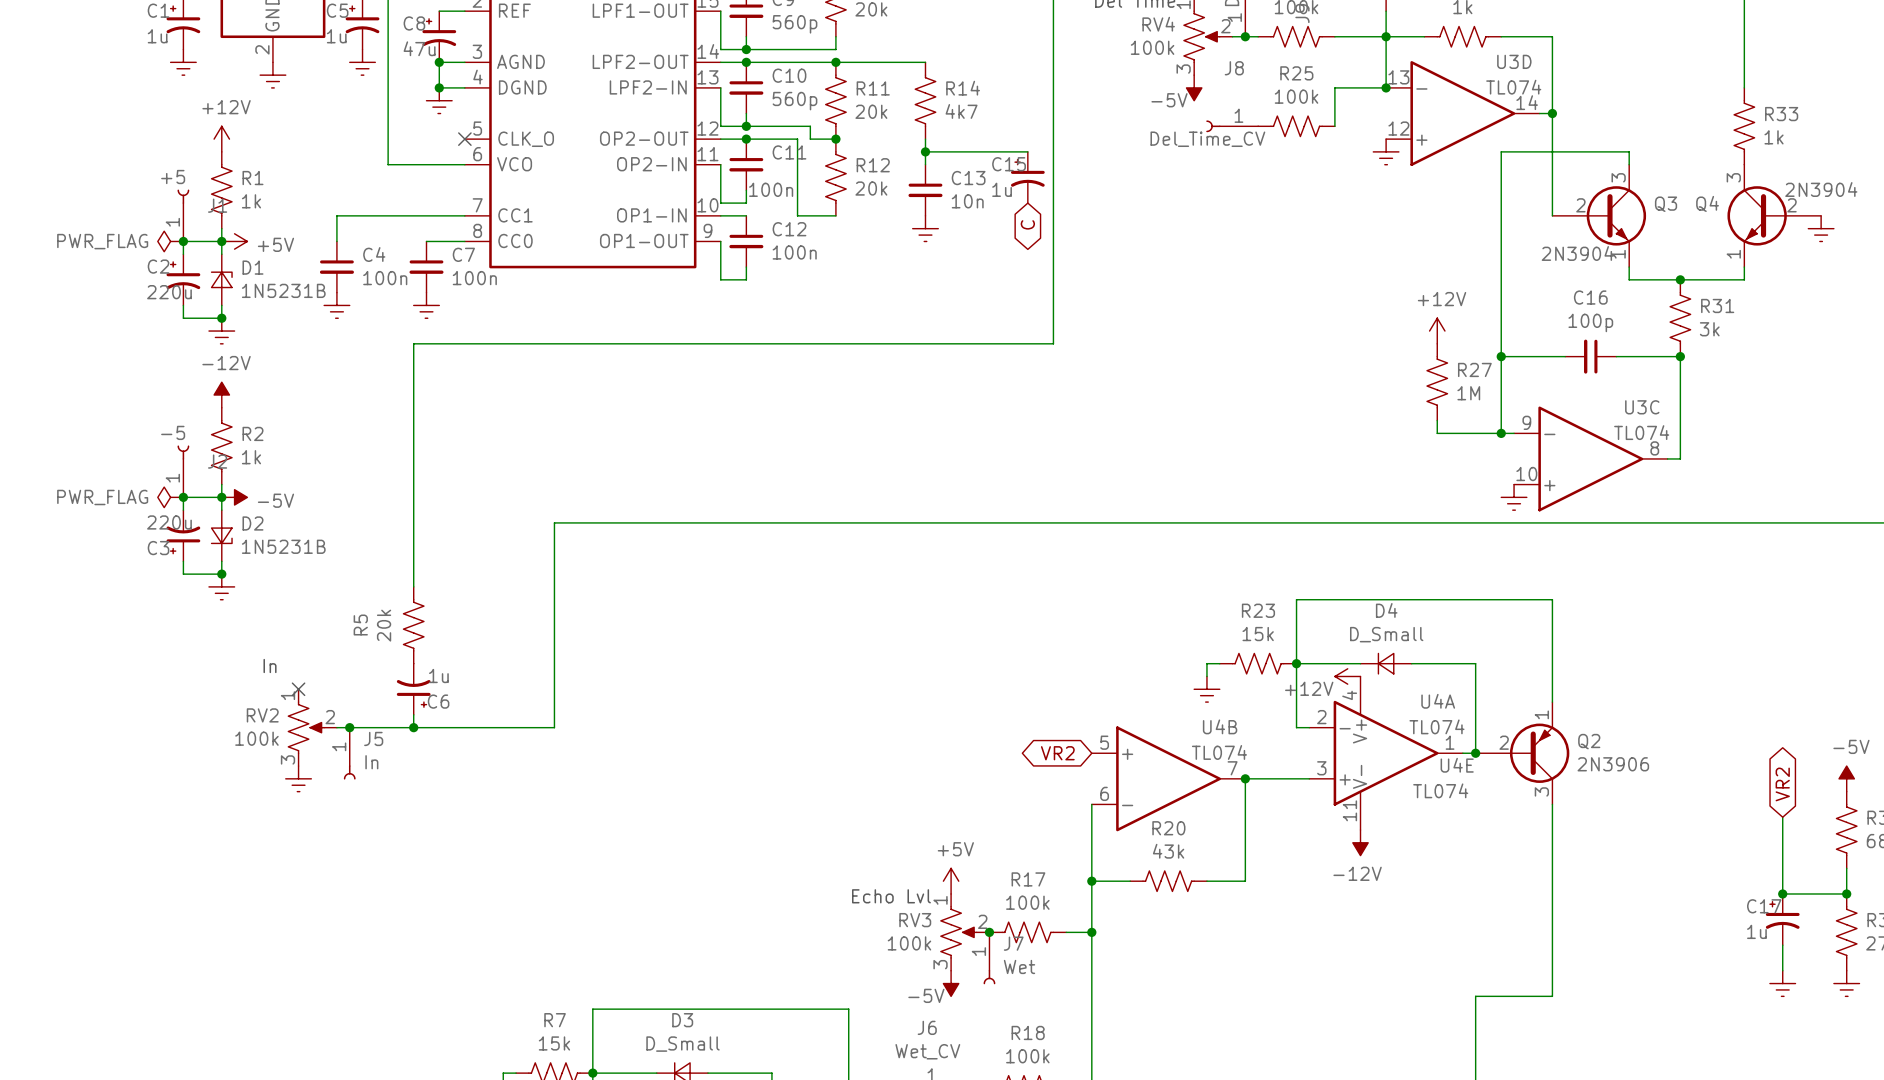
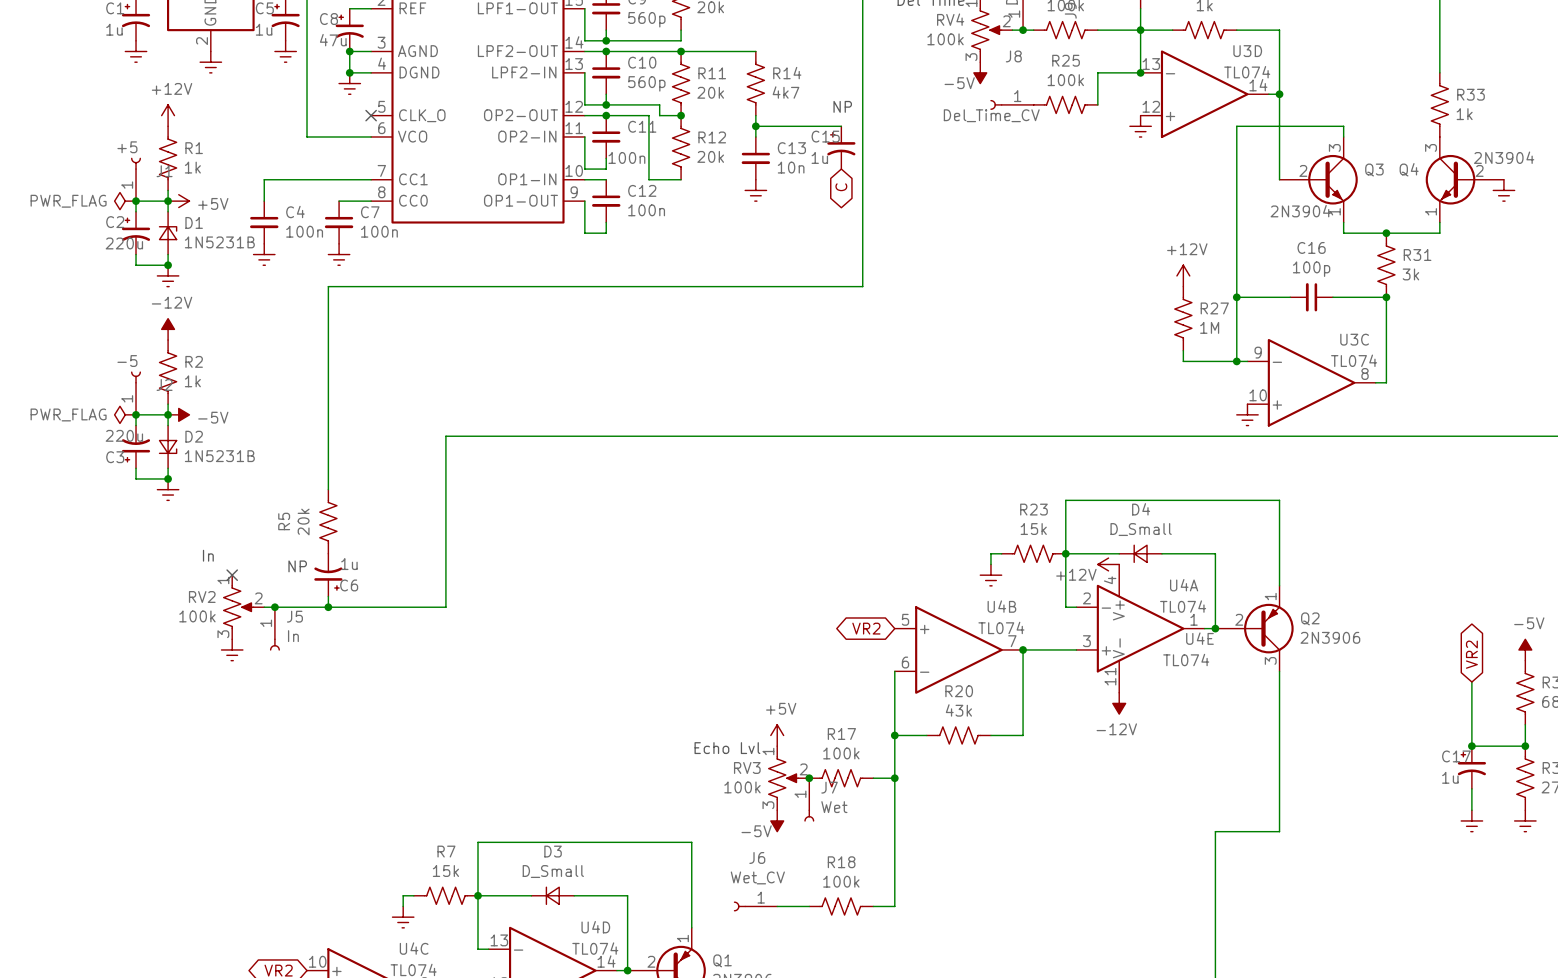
text: none -> NP (842, 106)
text: none -> NP (297, 566)

